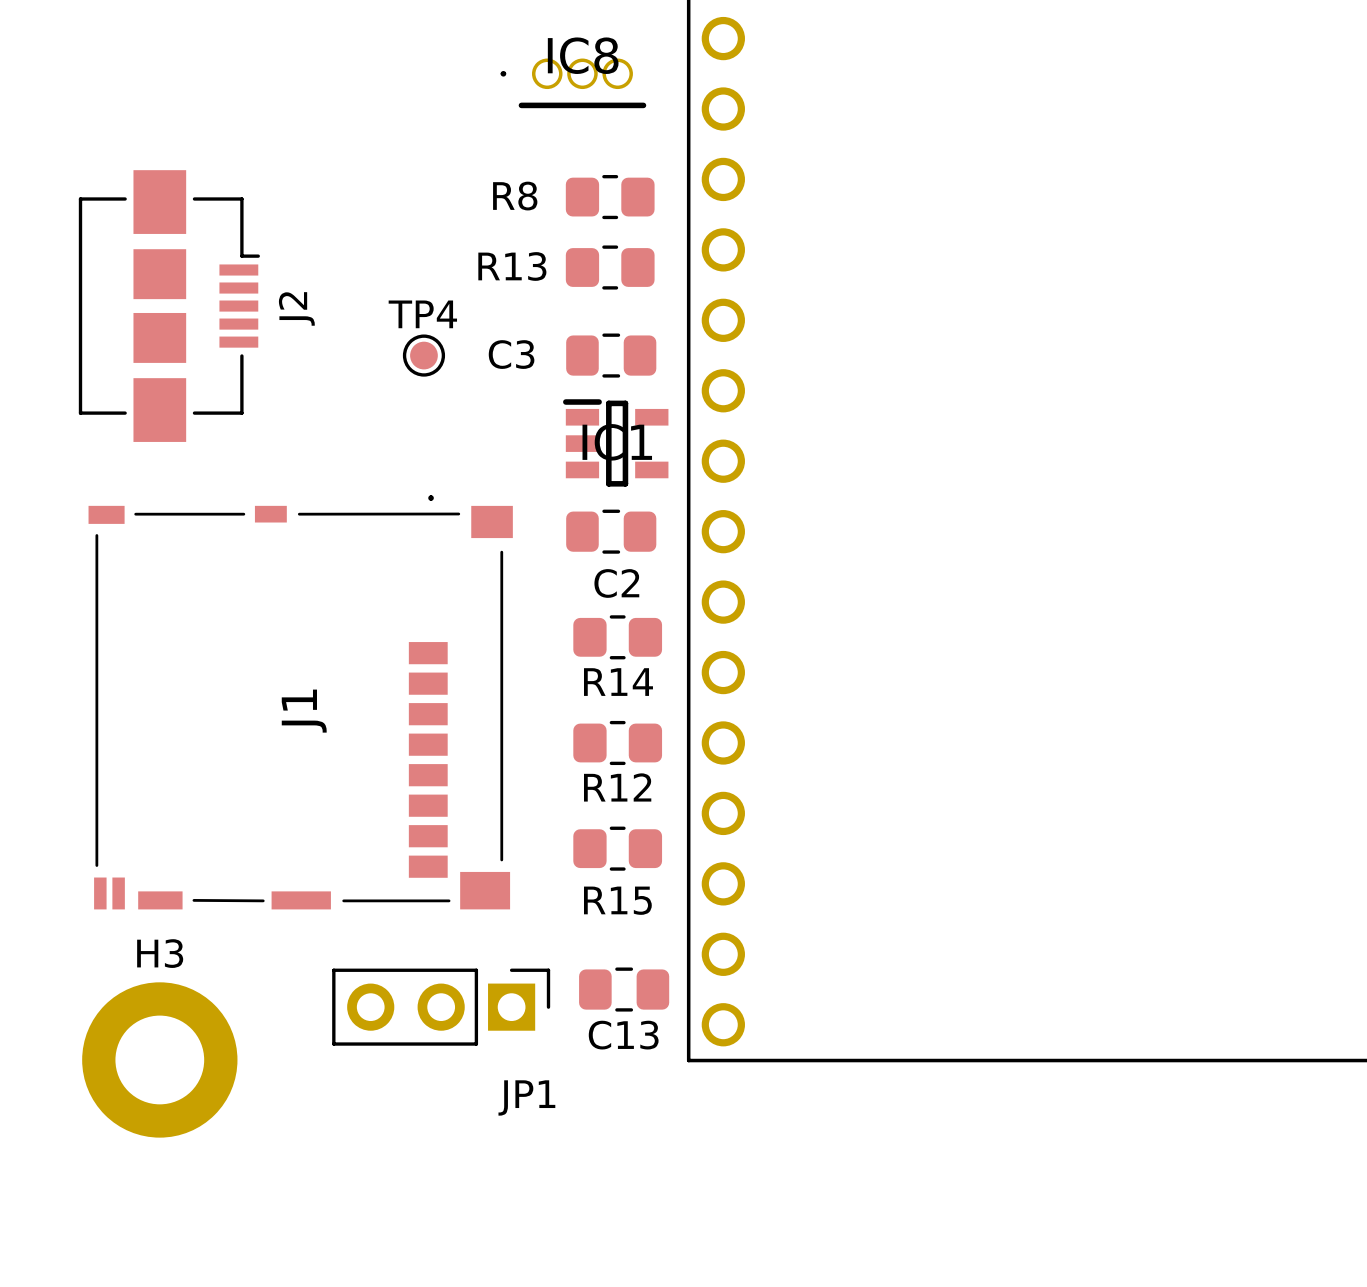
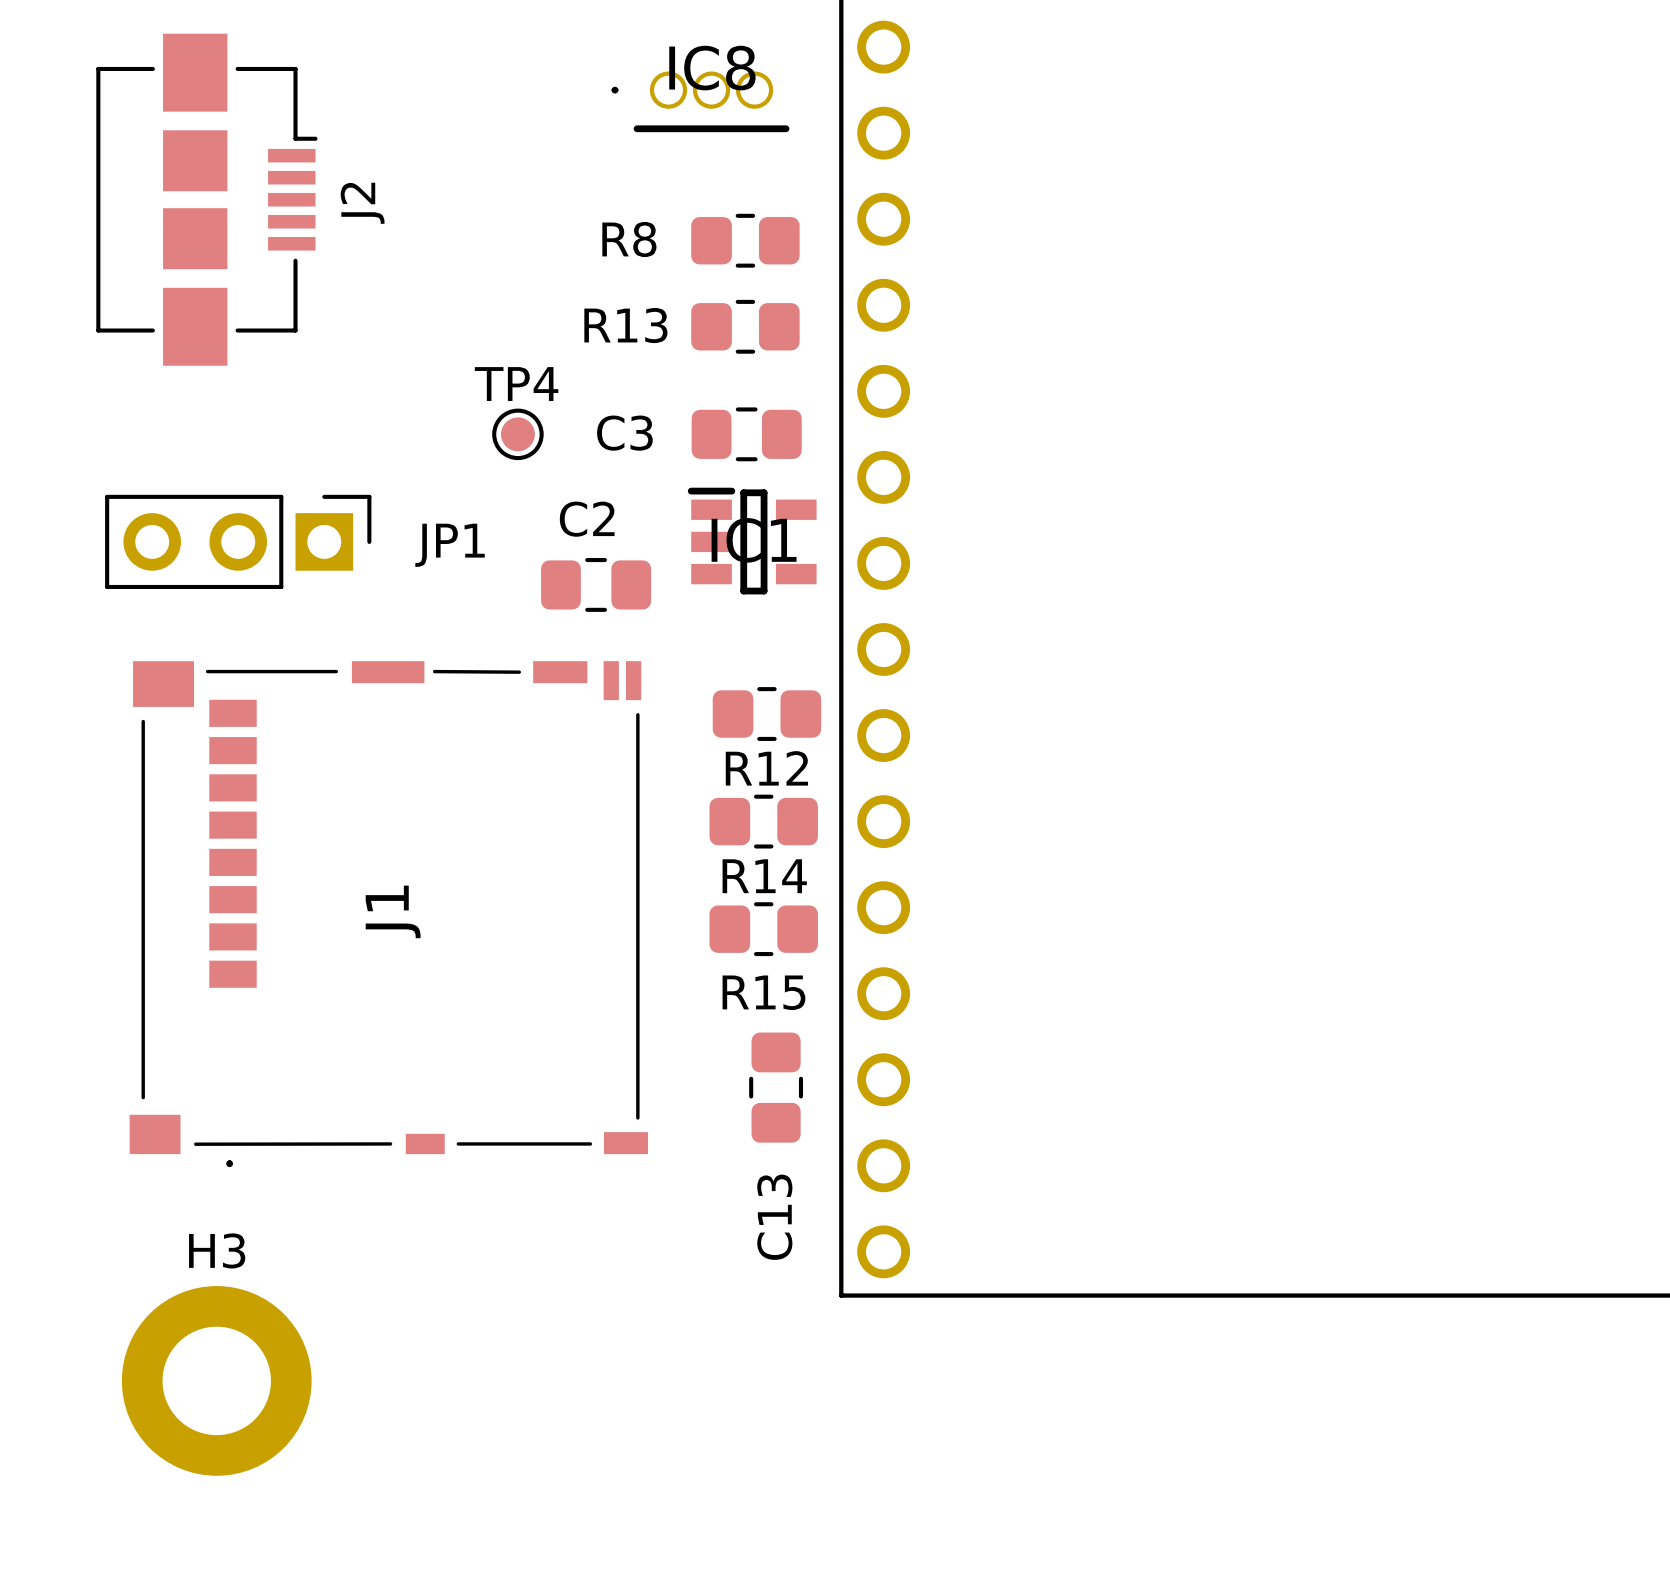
J2 position: (169, 306) -> (206, 199)
C2 position: (611, 531) -> (596, 584)
C2 name position: C2 (616, 583) -> C2 (587, 519)
R14 position: (617, 637) -> (763, 821)
J1 rotation: 0° (300, 702) -> 180° (388, 914)
R12 position: (617, 742) -> (766, 714)
R15 position: (617, 848) -> (763, 929)
C13 rotation: 0° (624, 989) -> 90° clockwise (776, 1087)
C13 position: (624, 989) -> (776, 1087)
JP1 position: (441, 1007) -> (238, 541)
C13 name position: C13 (623, 1035) -> C13 (774, 1217)
H3 position: (159, 1059) -> (216, 1380)
JP1 name position: JP1 (526, 1097) -> JP1 (450, 545)

